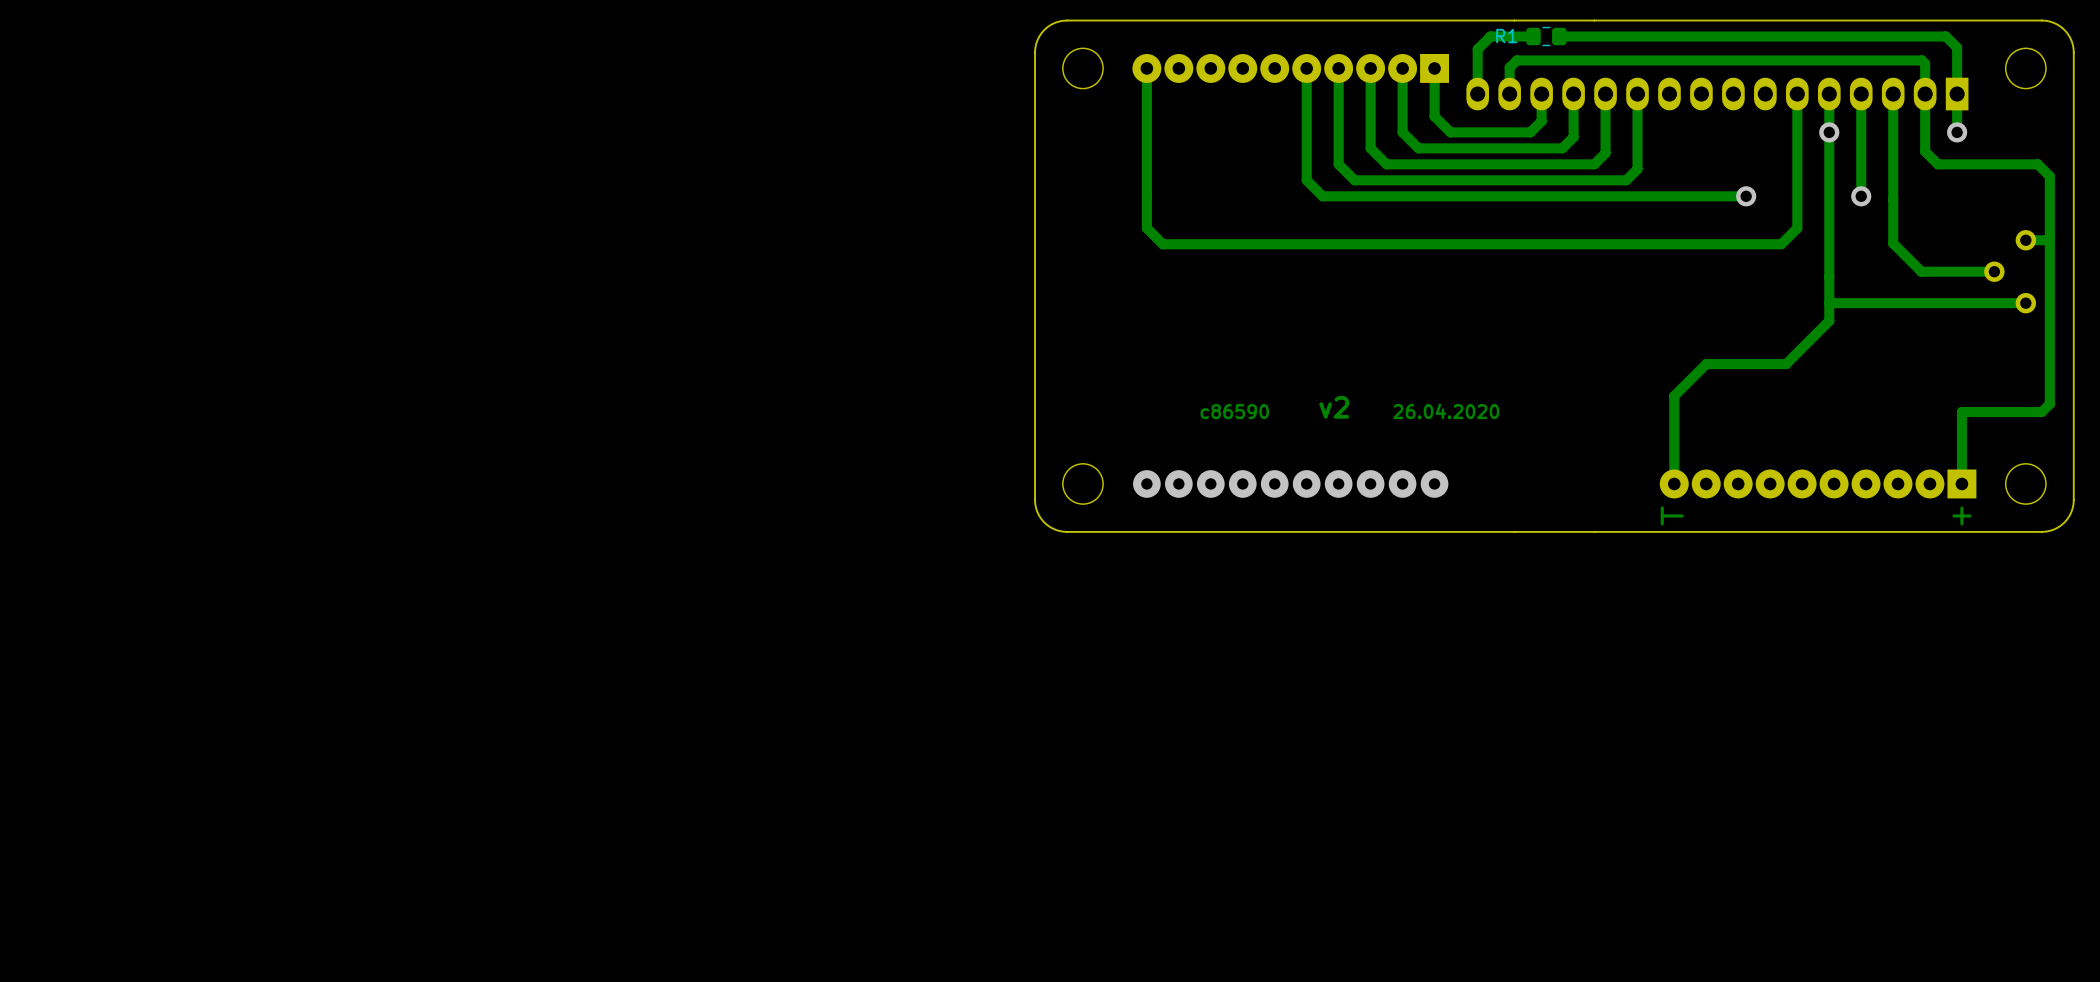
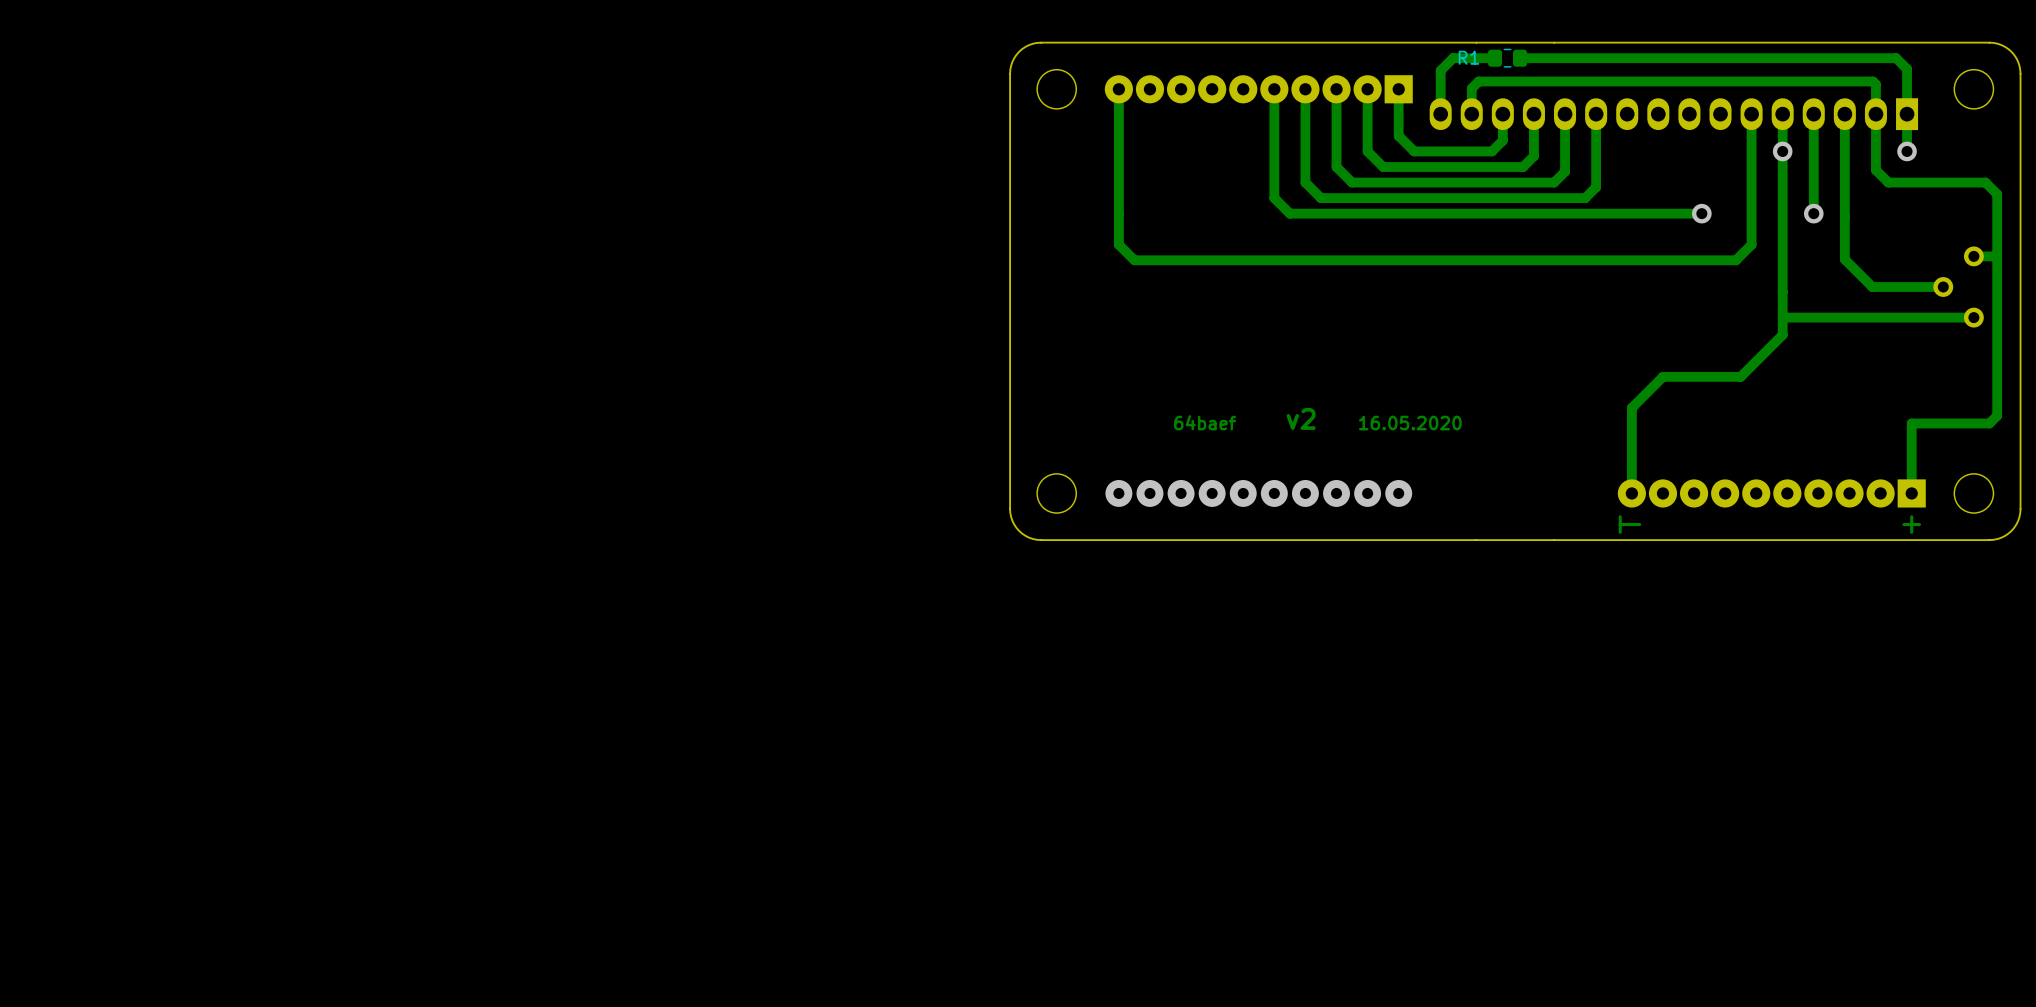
text: c86590 (1234, 411) -> 64baef (1204, 422)
text: 26.04.2020 (1446, 411) -> 16.05.2020 (1410, 423)

